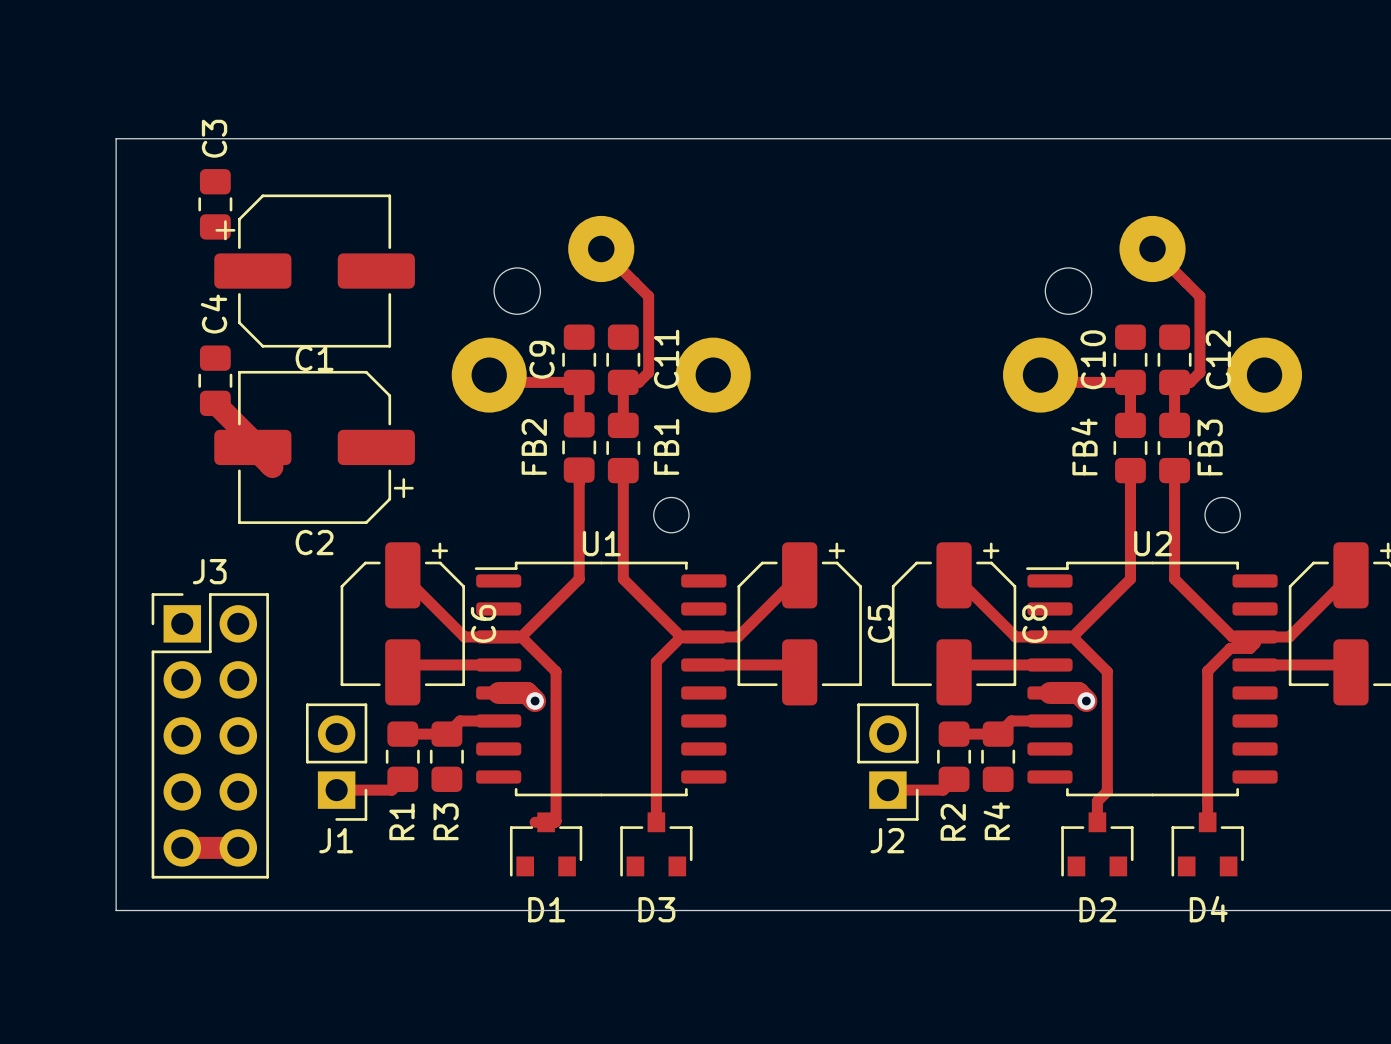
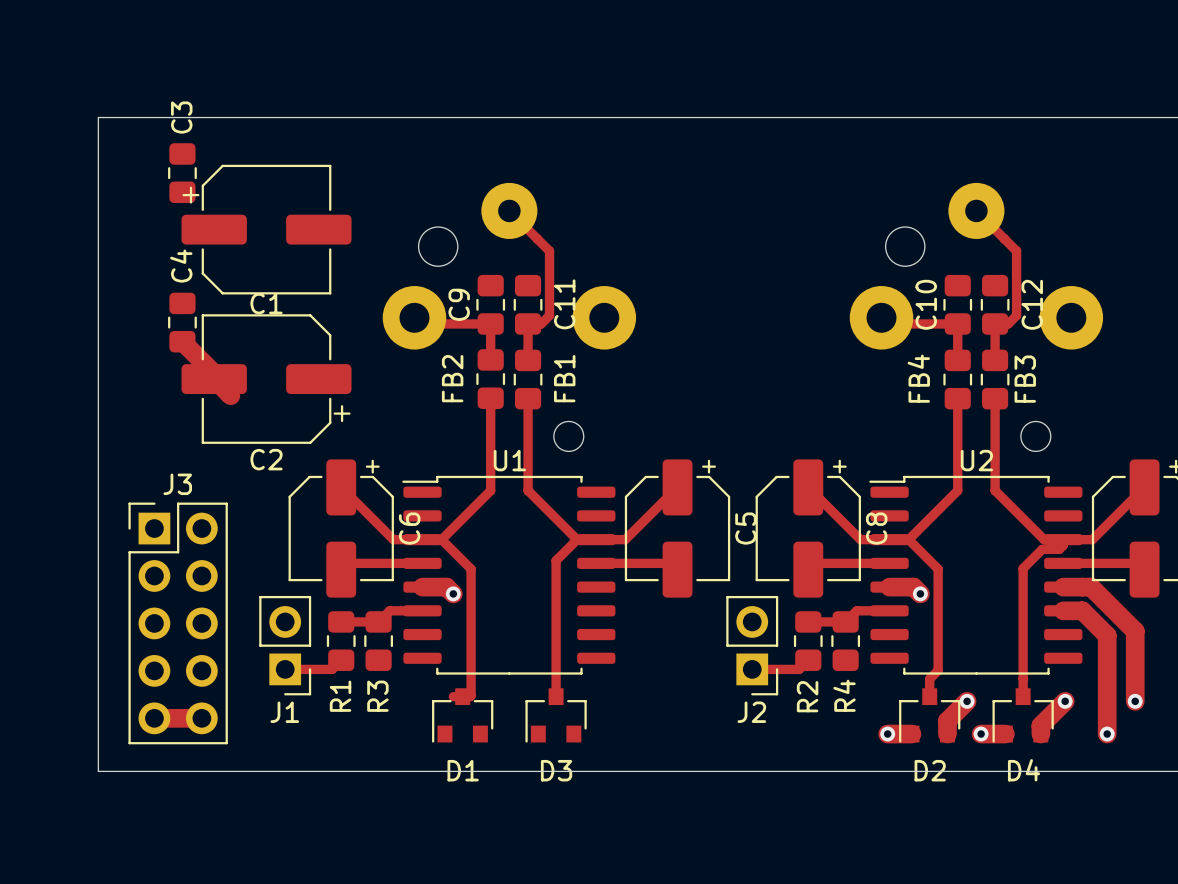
track: none -> (1063, 587) (1091, 587) (1135, 631) (1135, 701)
track: none -> (1063, 610) (1082, 610) (1107, 635) (1107, 734)
track: none -> (967, 701) (947, 720) (947, 734)
via: none -> (967, 701)
track: none -> (1065, 701) (1040, 725) (1040, 734)
via: none -> (1065, 701)
via: none -> (1135, 701)
track: none -> (887, 734) (911, 734)
via: none -> (887, 734)
track: none -> (981, 734) (1005, 734)
via: none -> (981, 734)
via: none -> (1107, 734)

